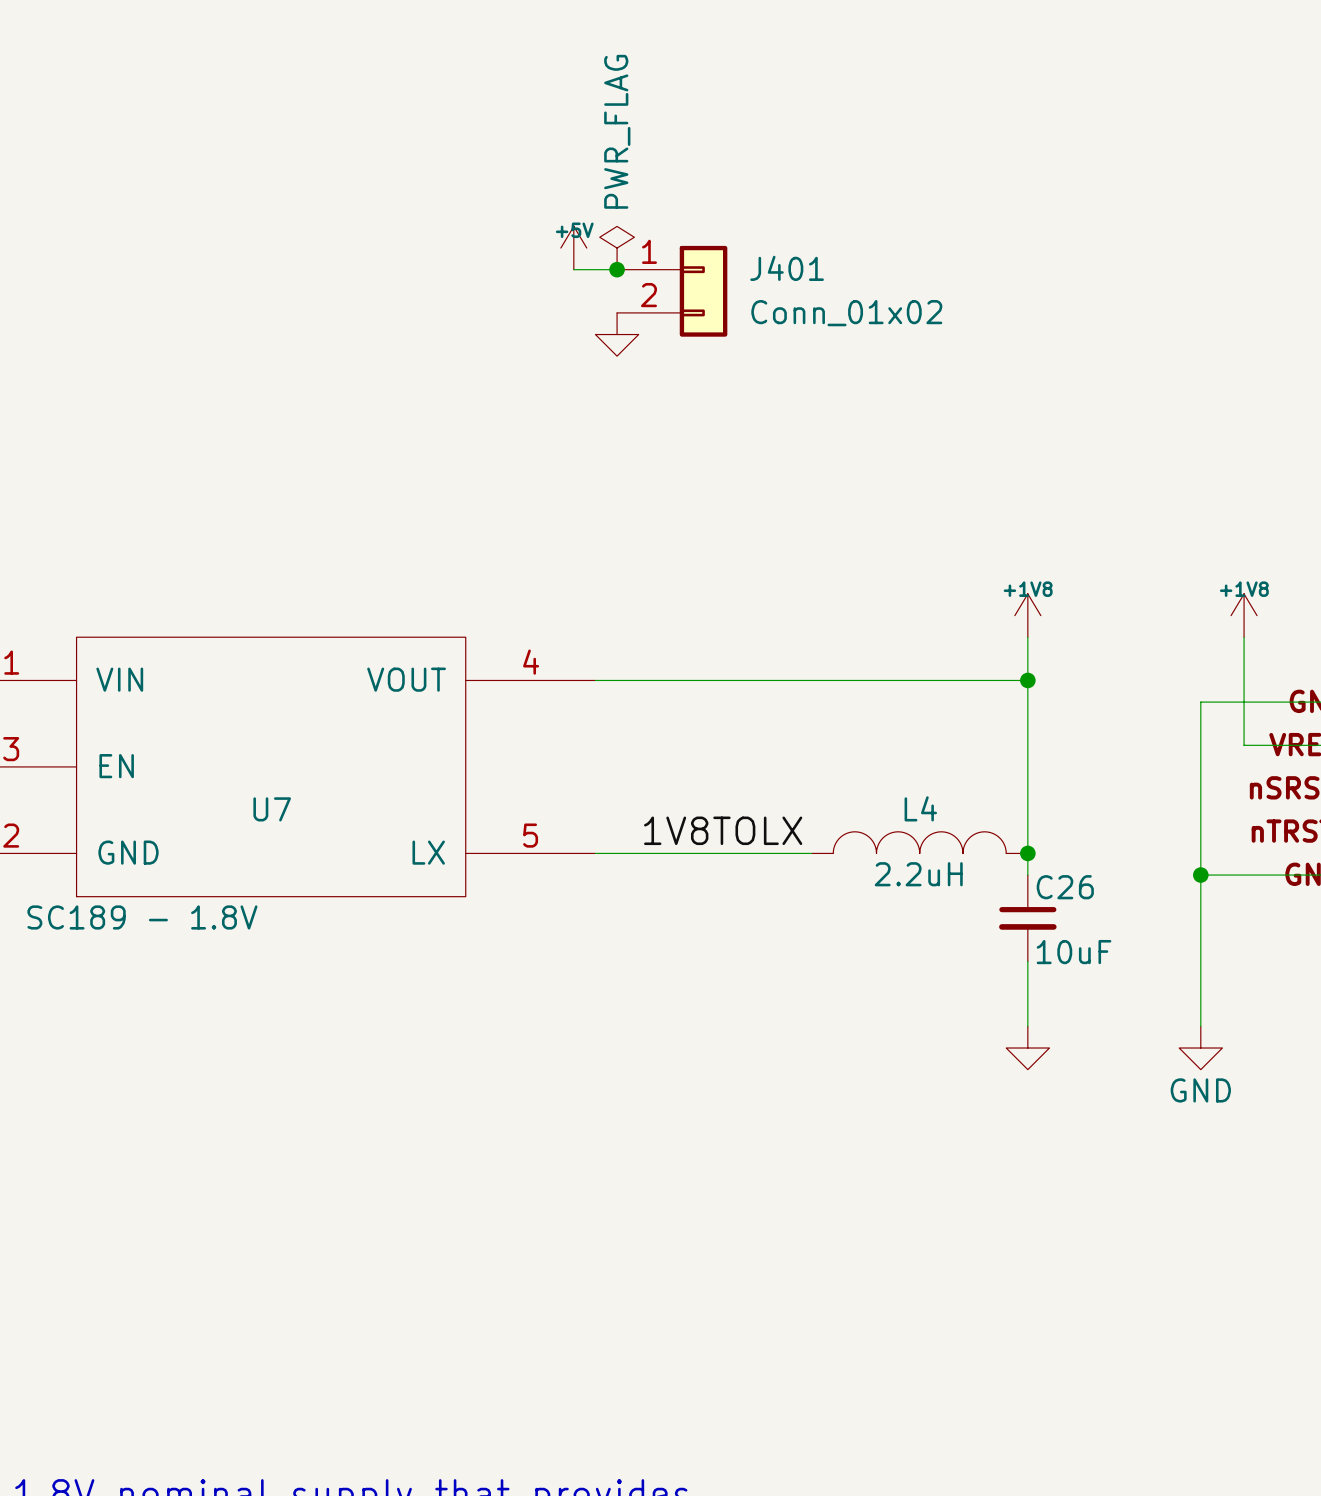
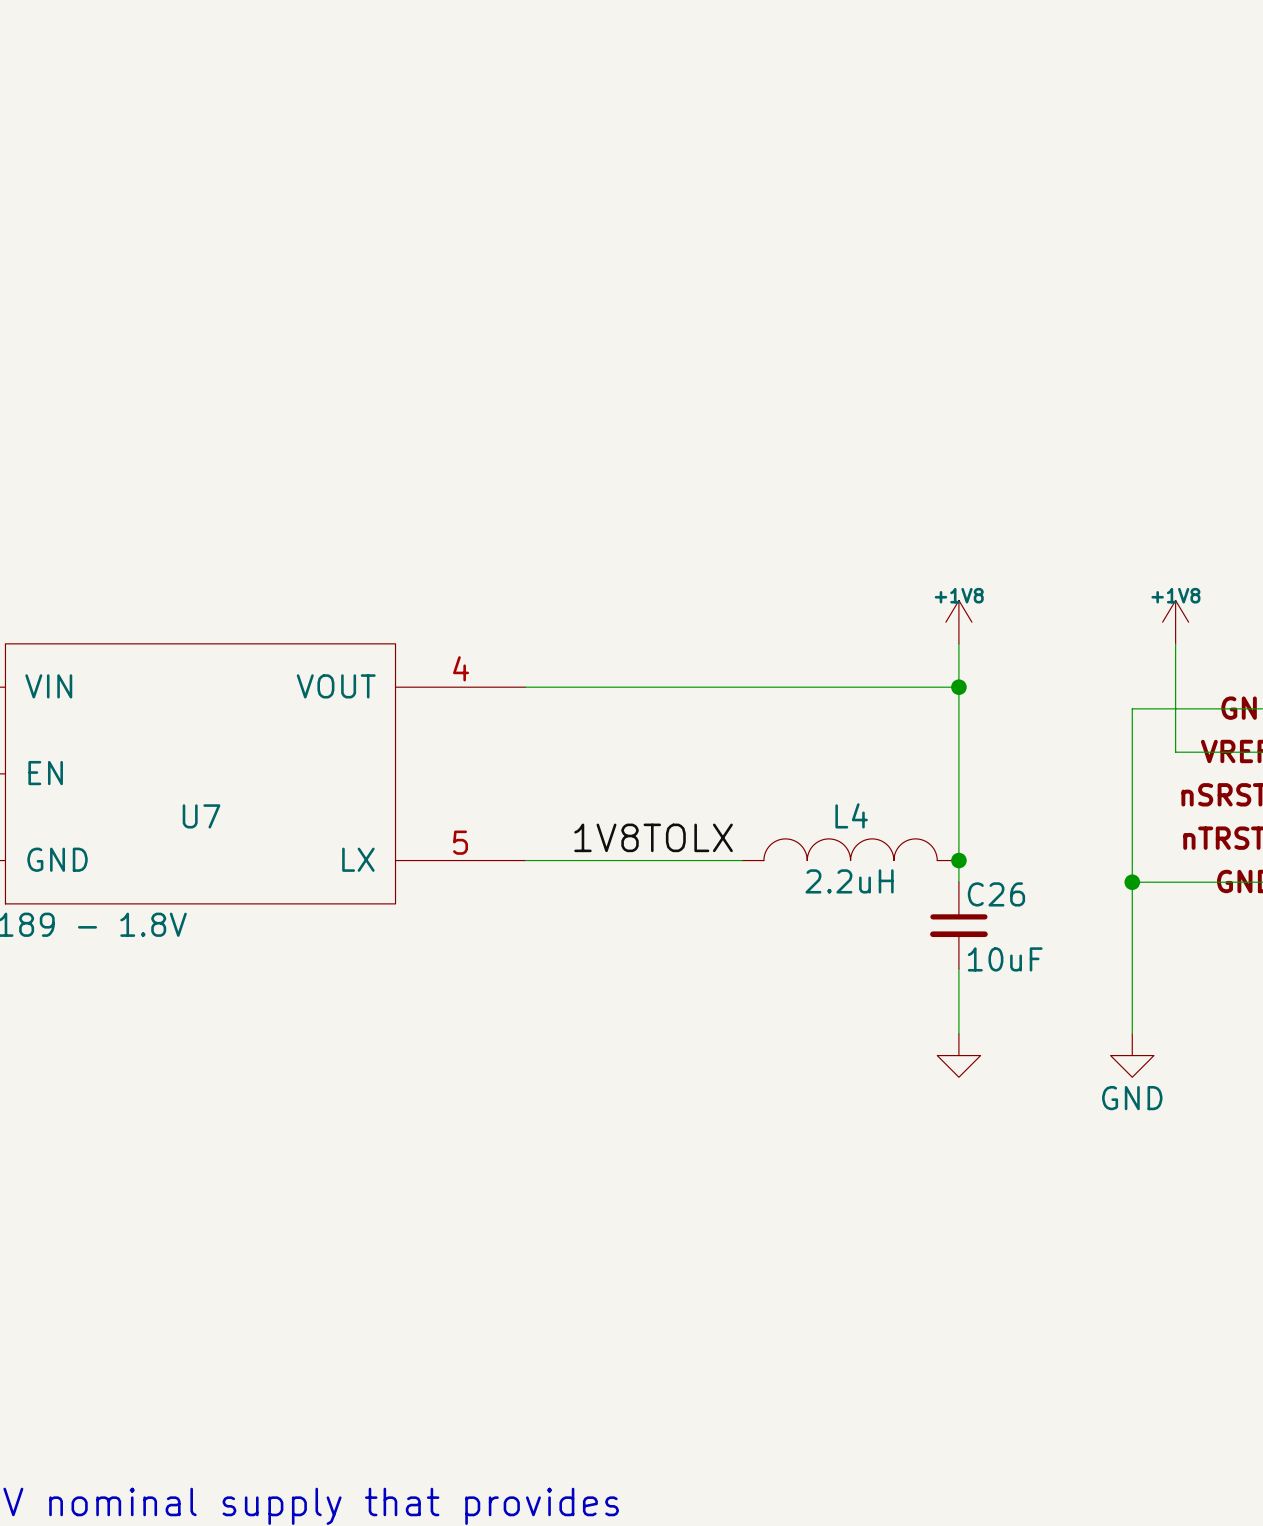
power symbol: +5V (573, 248) -> none
power symbol: PWR_FLAG (617, 248) -> none
wire: (573, 269) (617, 269) -> none
junction: (617, 269) -> none
J401: Conn_01x02 (672, 291) -> none
power symbol: (617, 334) -> none

